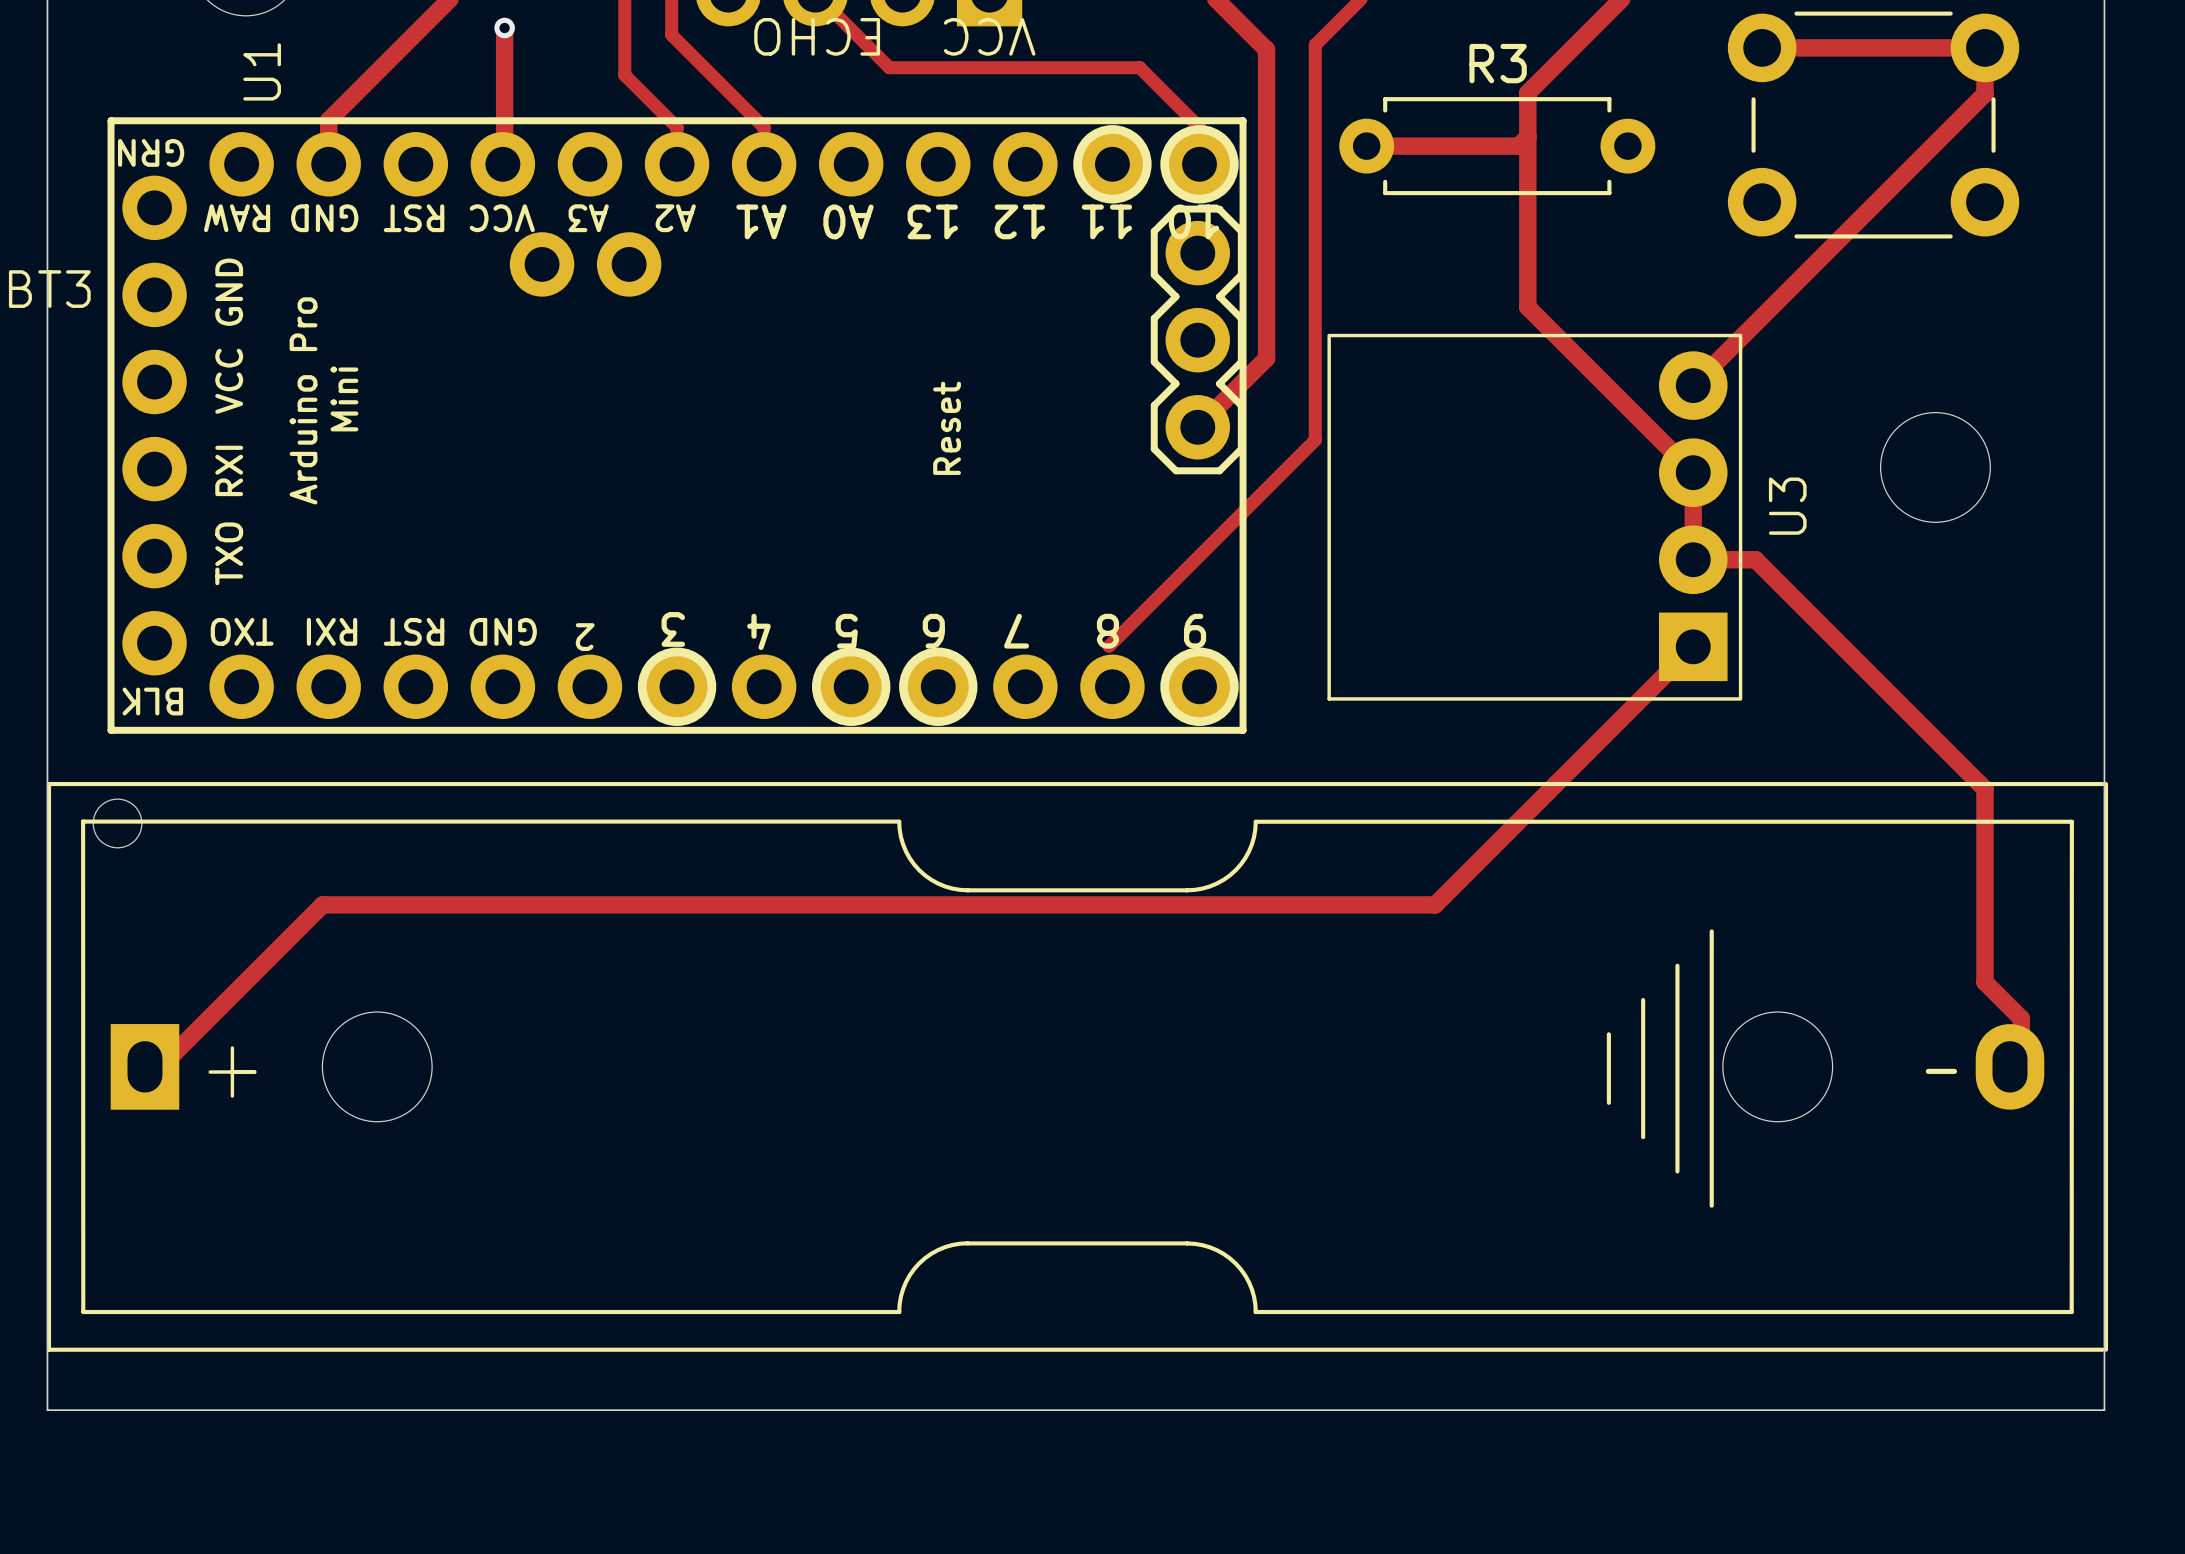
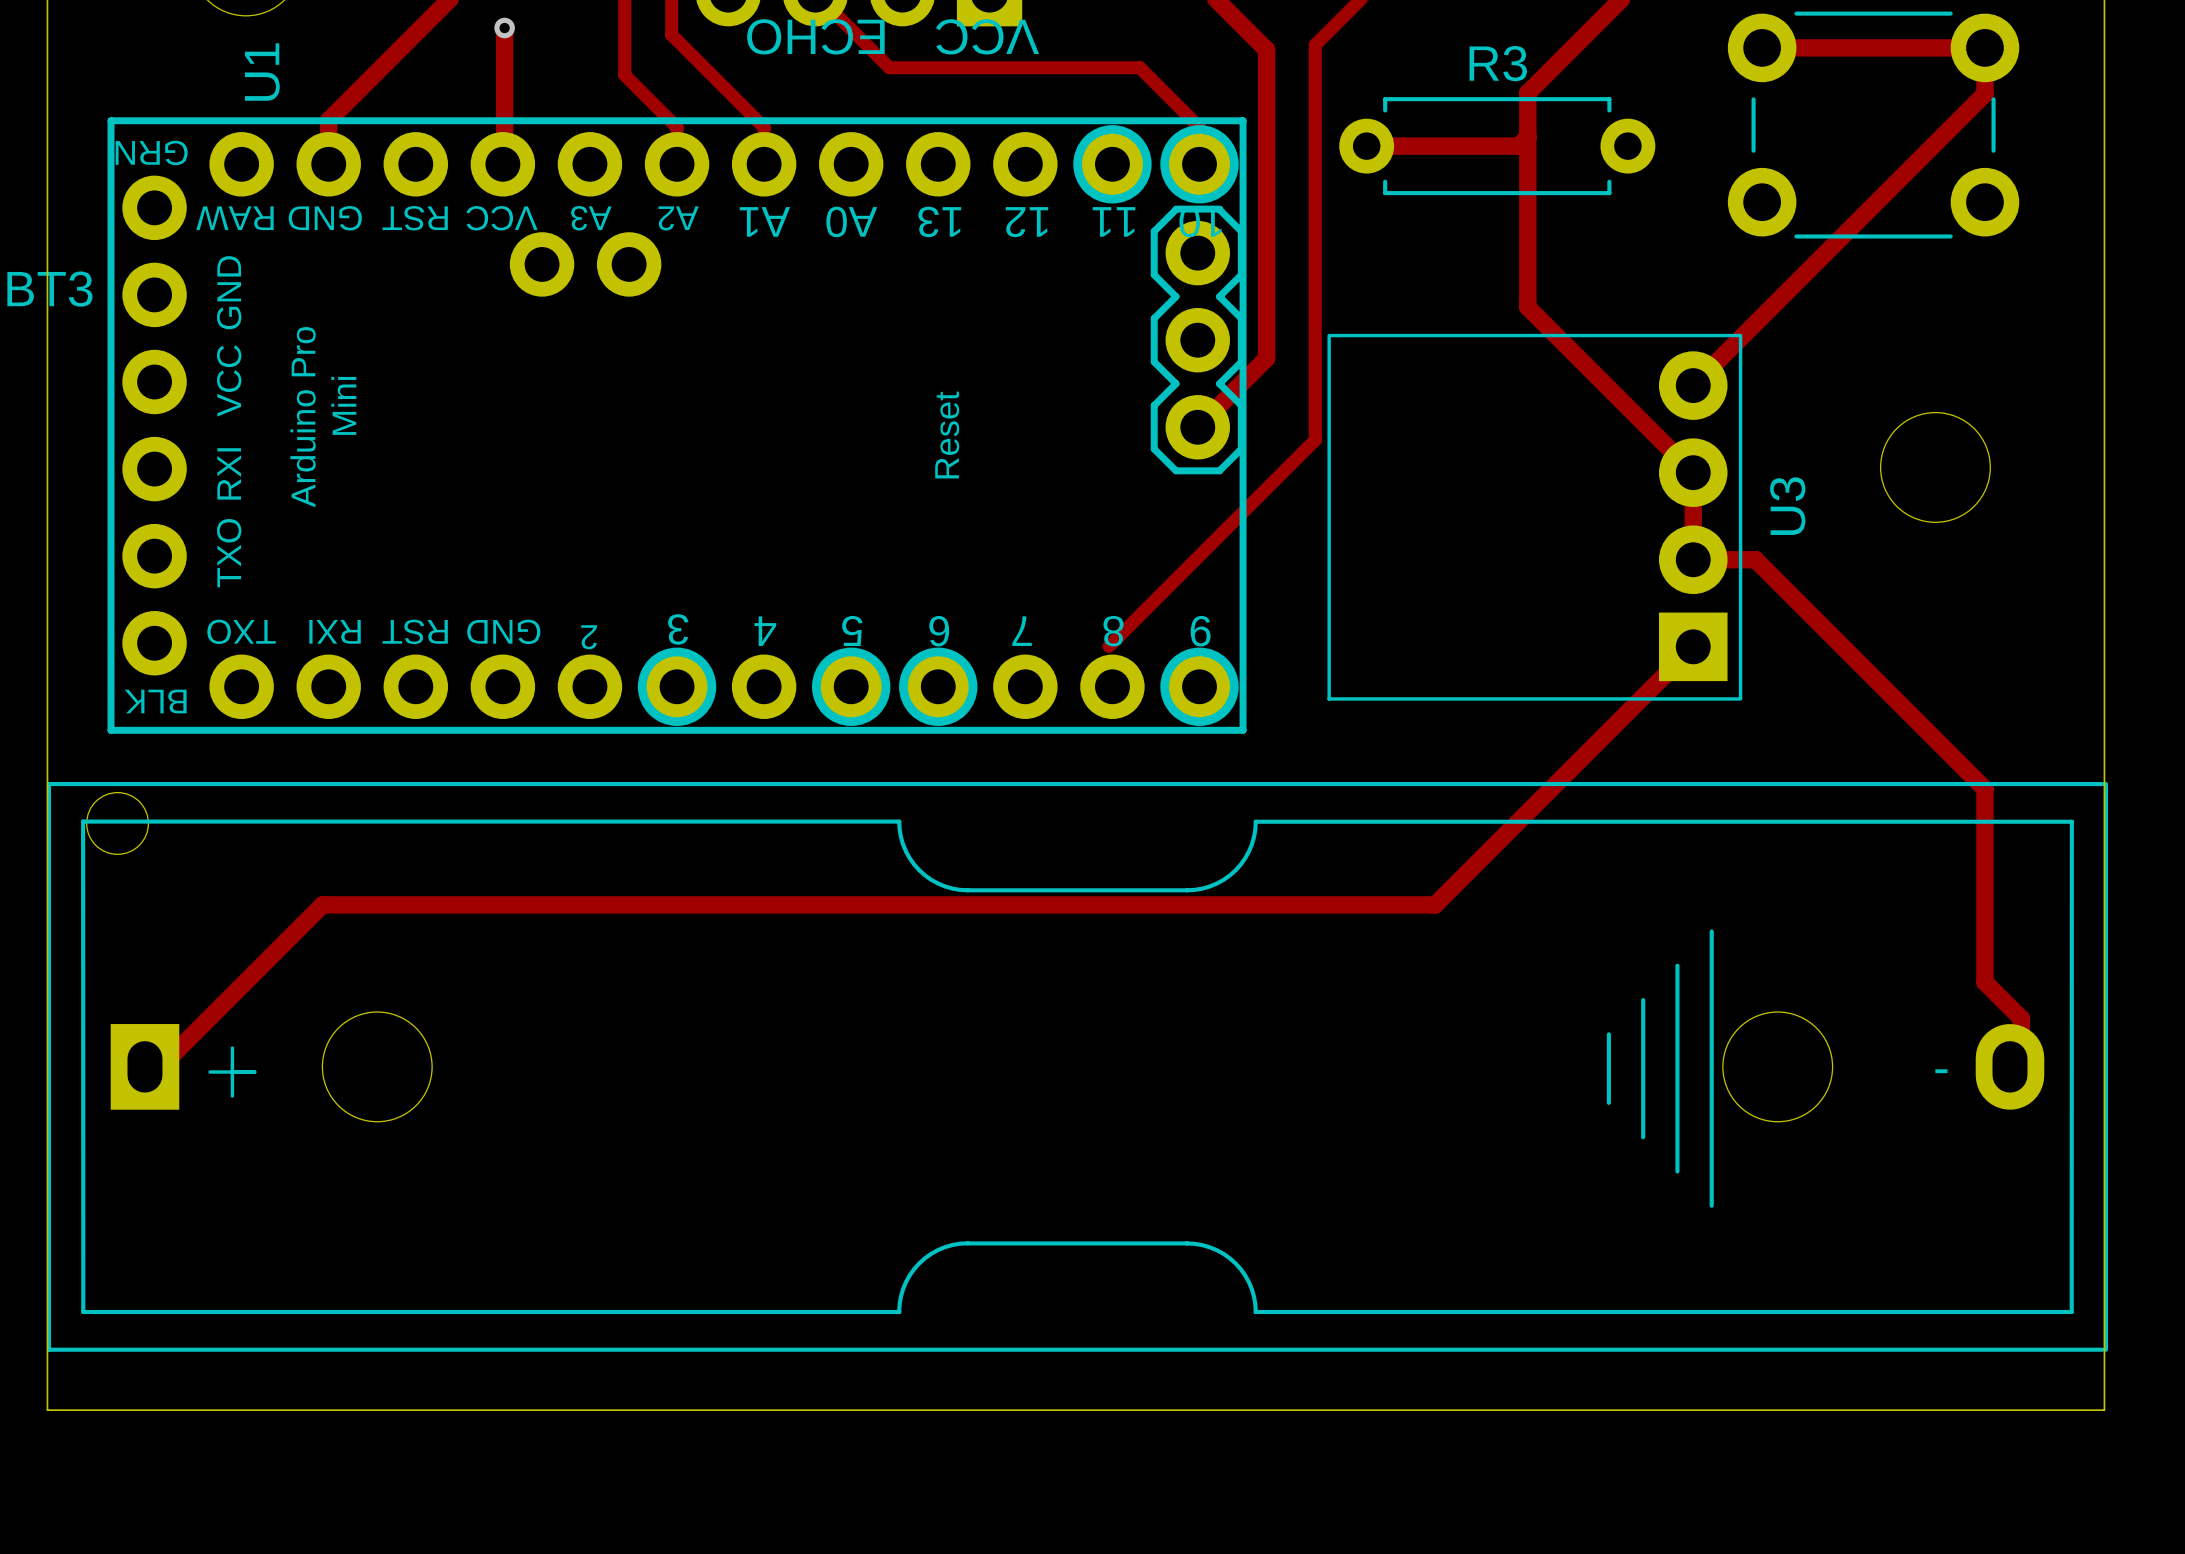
BT3 footprint: [46, 781, 2109, 1352] -> [46, 781, 2109, 1352]

